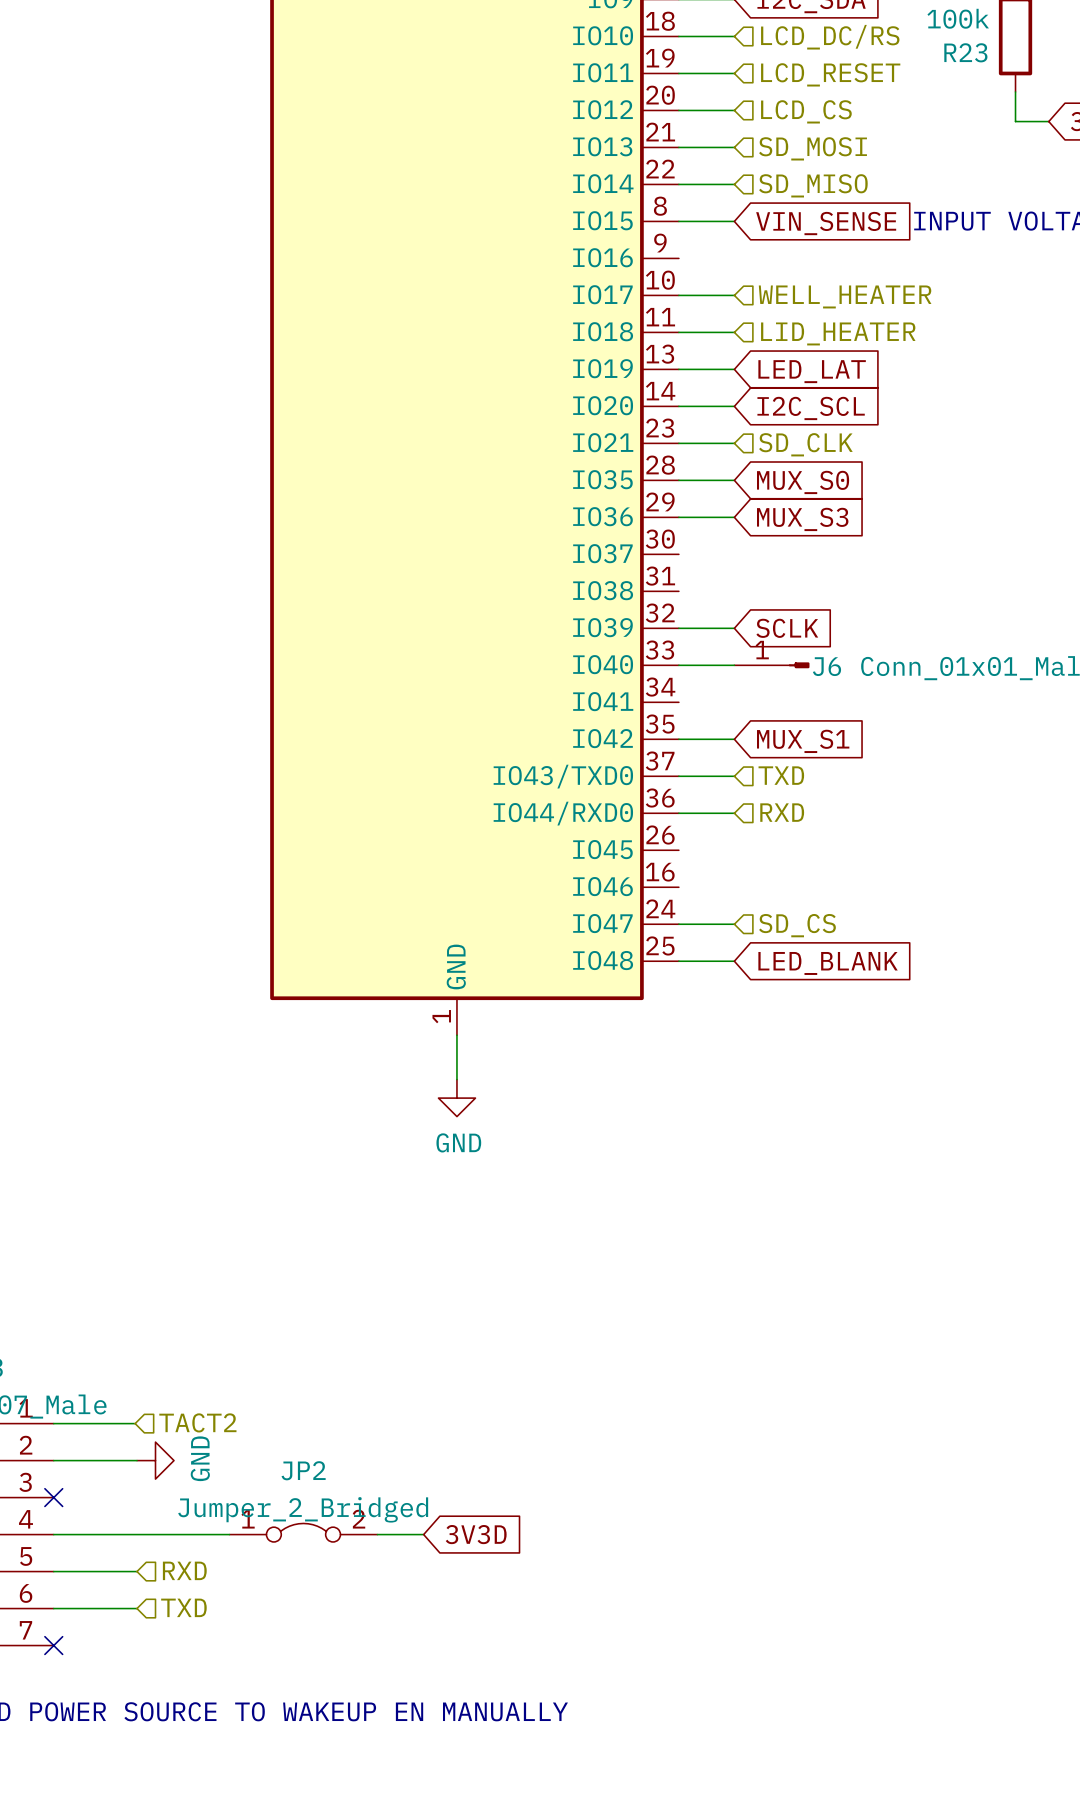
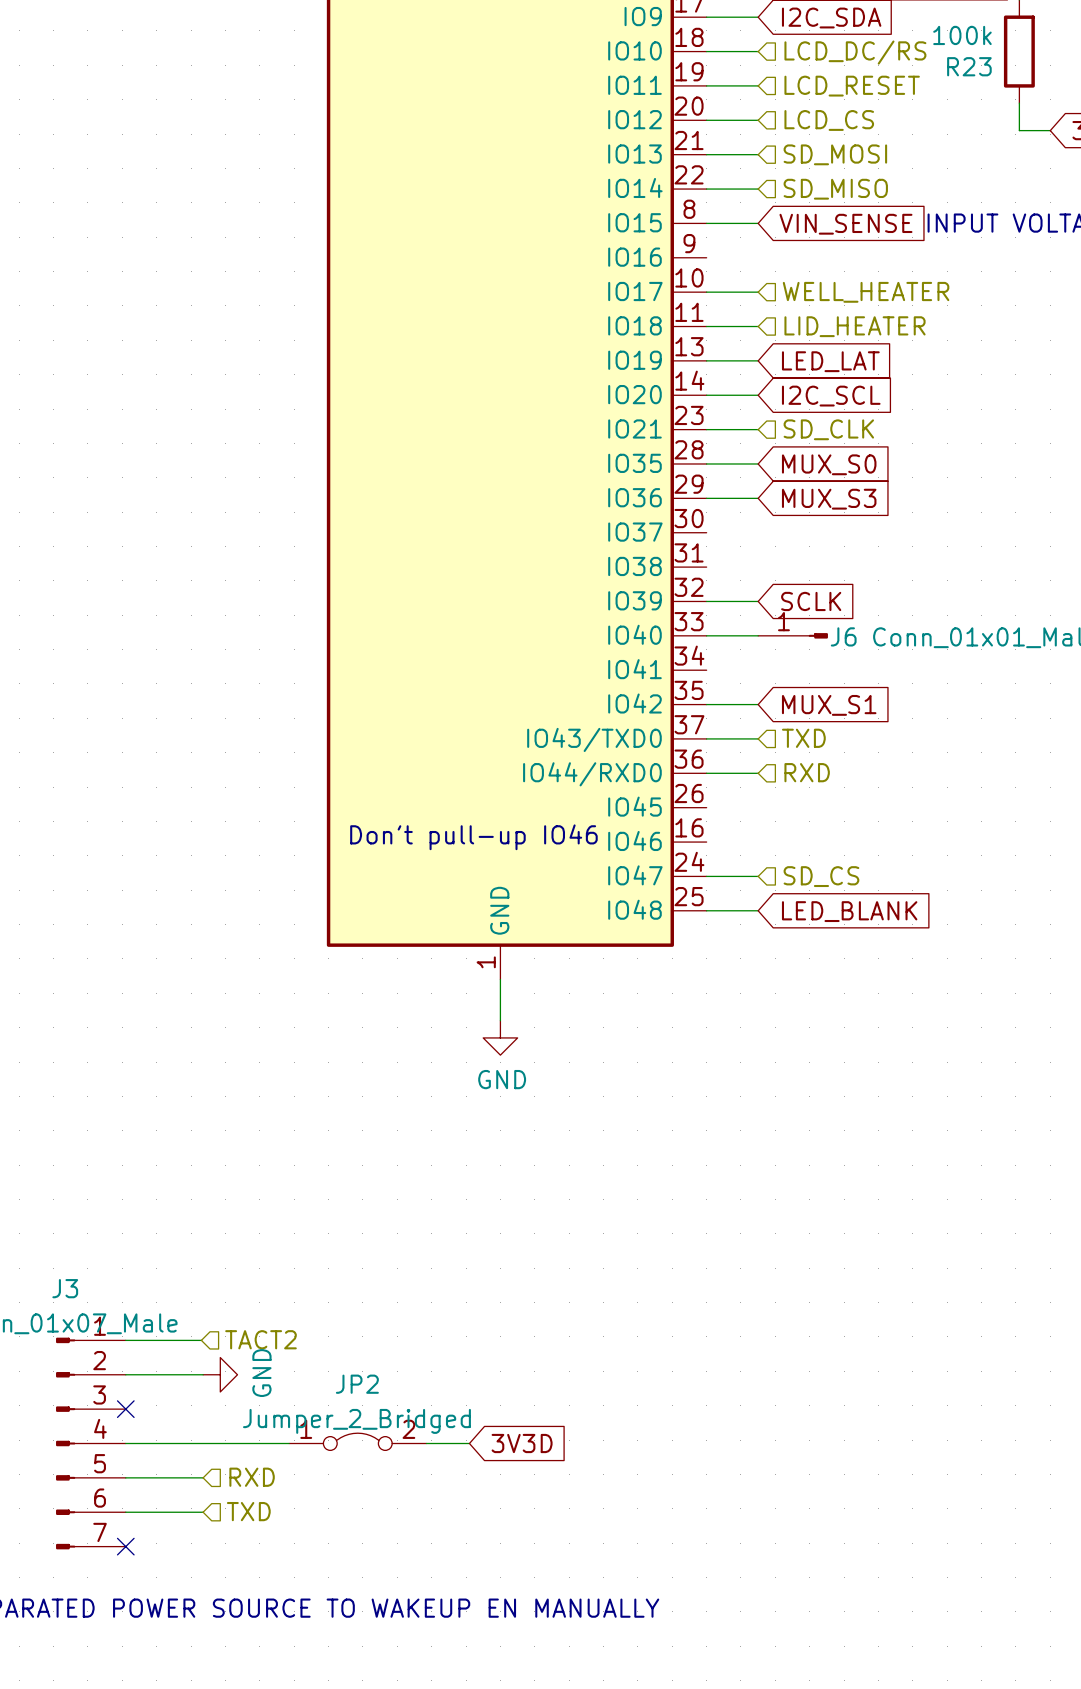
text: none -> Don't pull-up IO46 (473, 837)

